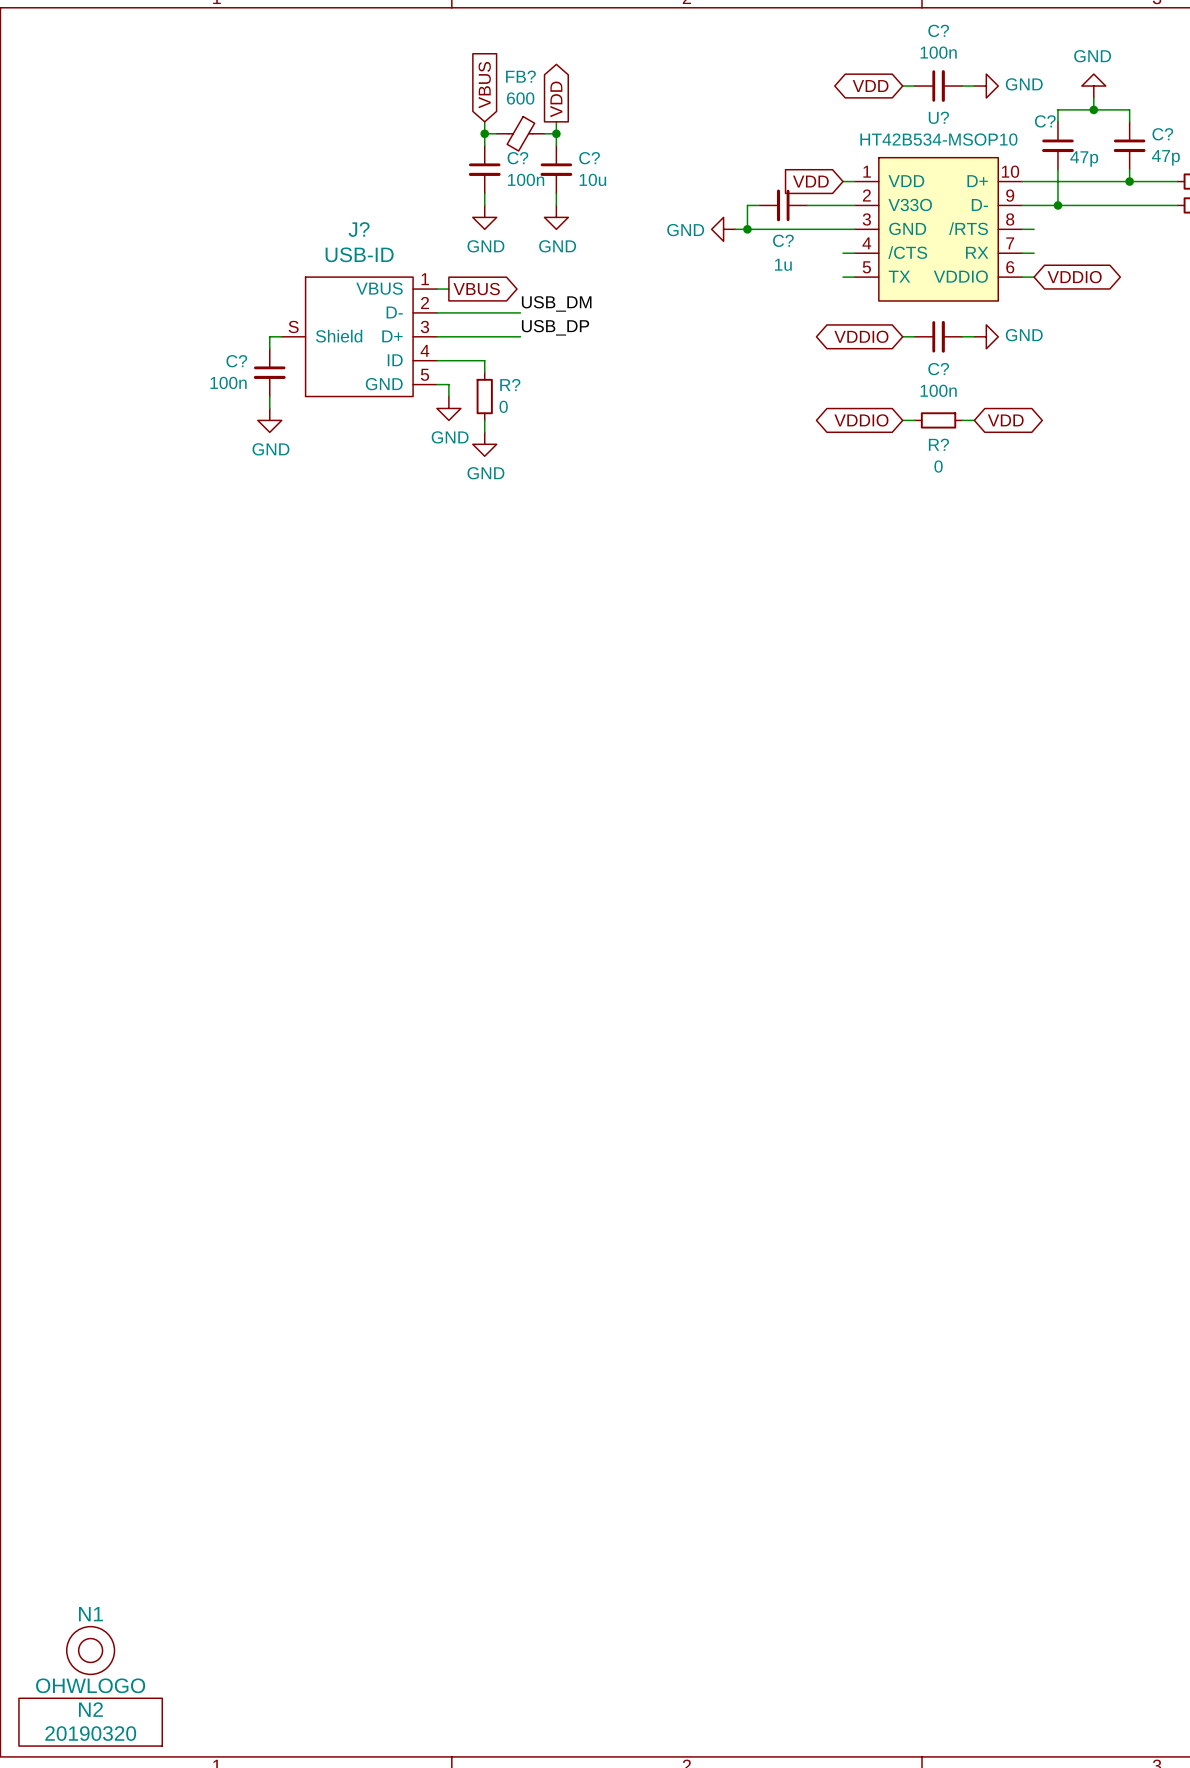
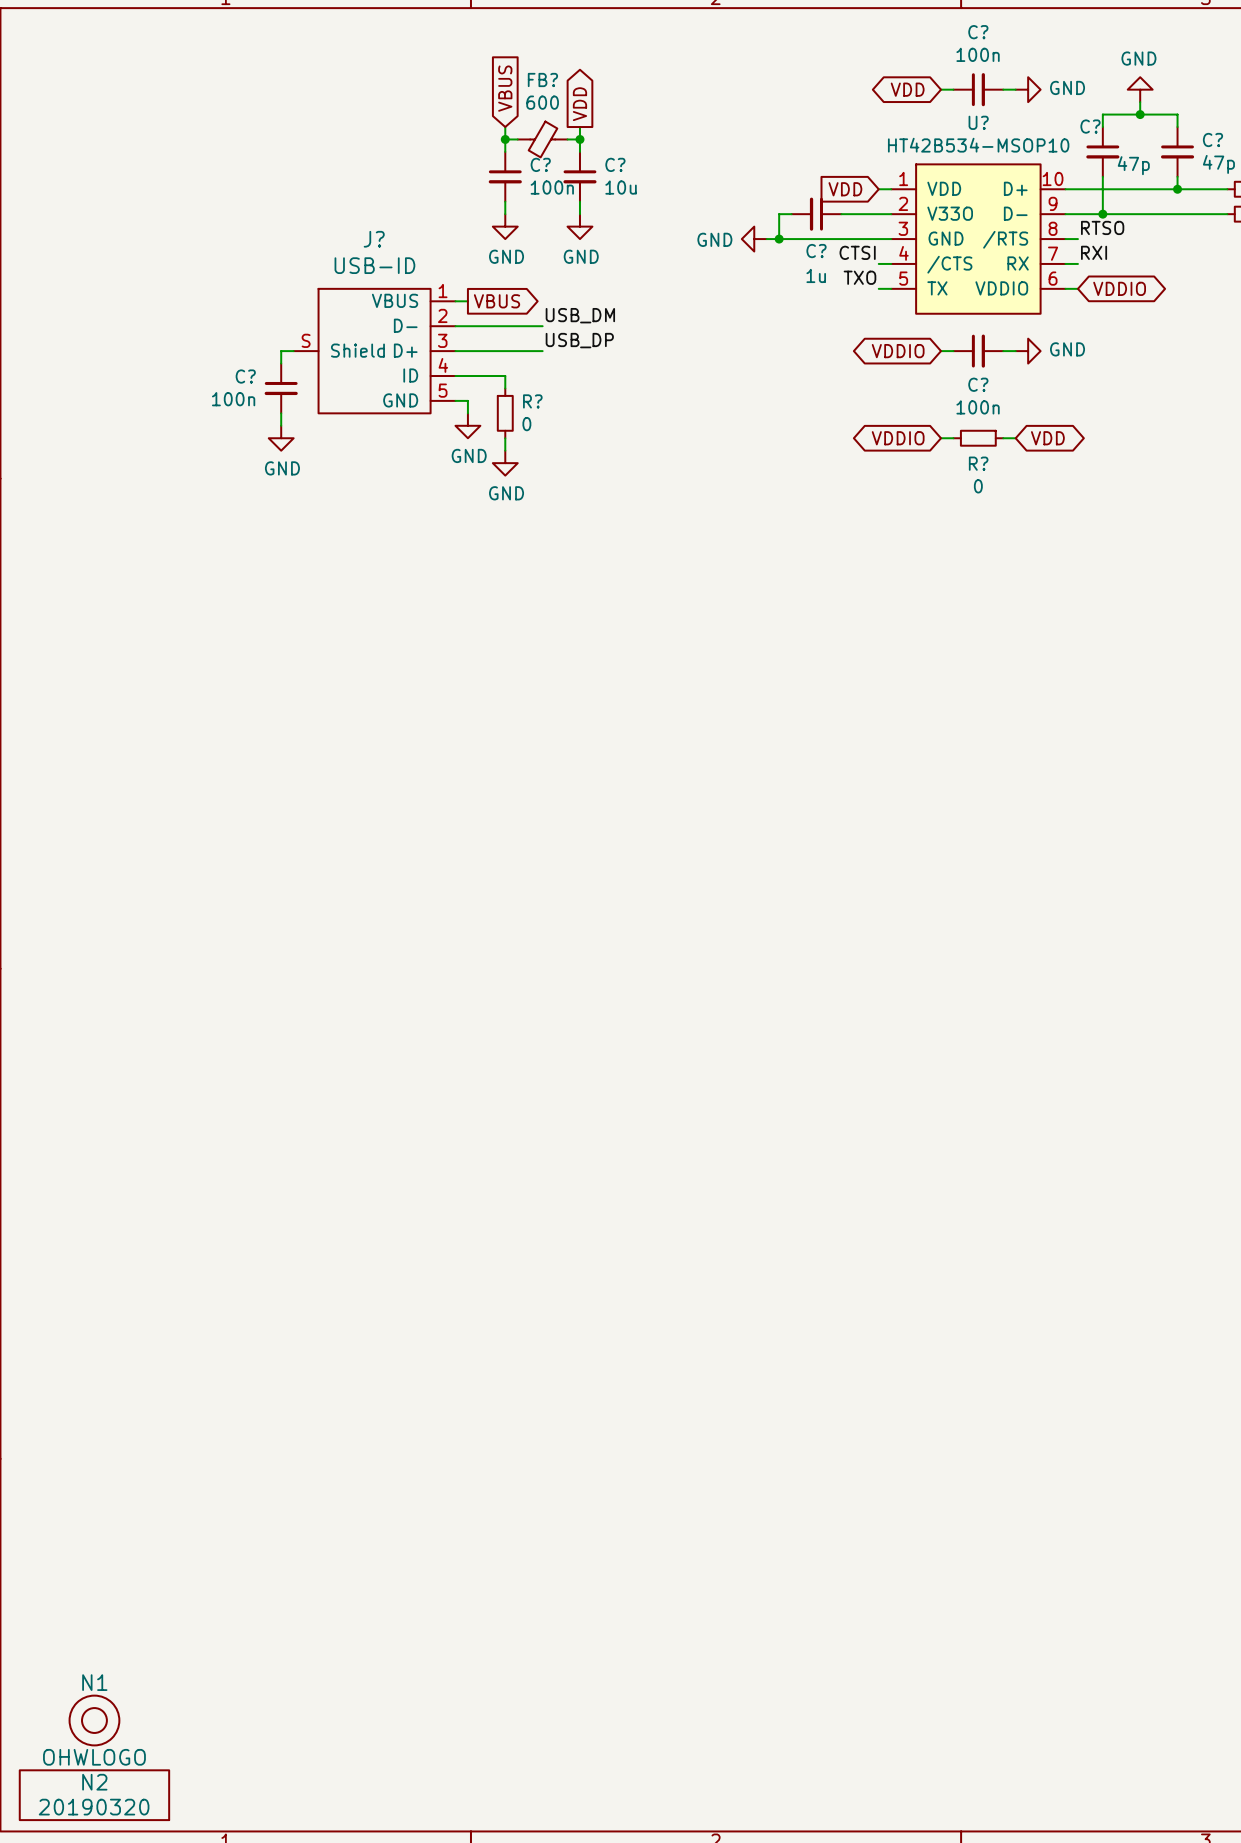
label: none -> RTSO (1102, 227)
label: none -> CTSI (857, 252)
label: none -> RXI (1094, 252)
label: none -> TXO (859, 277)

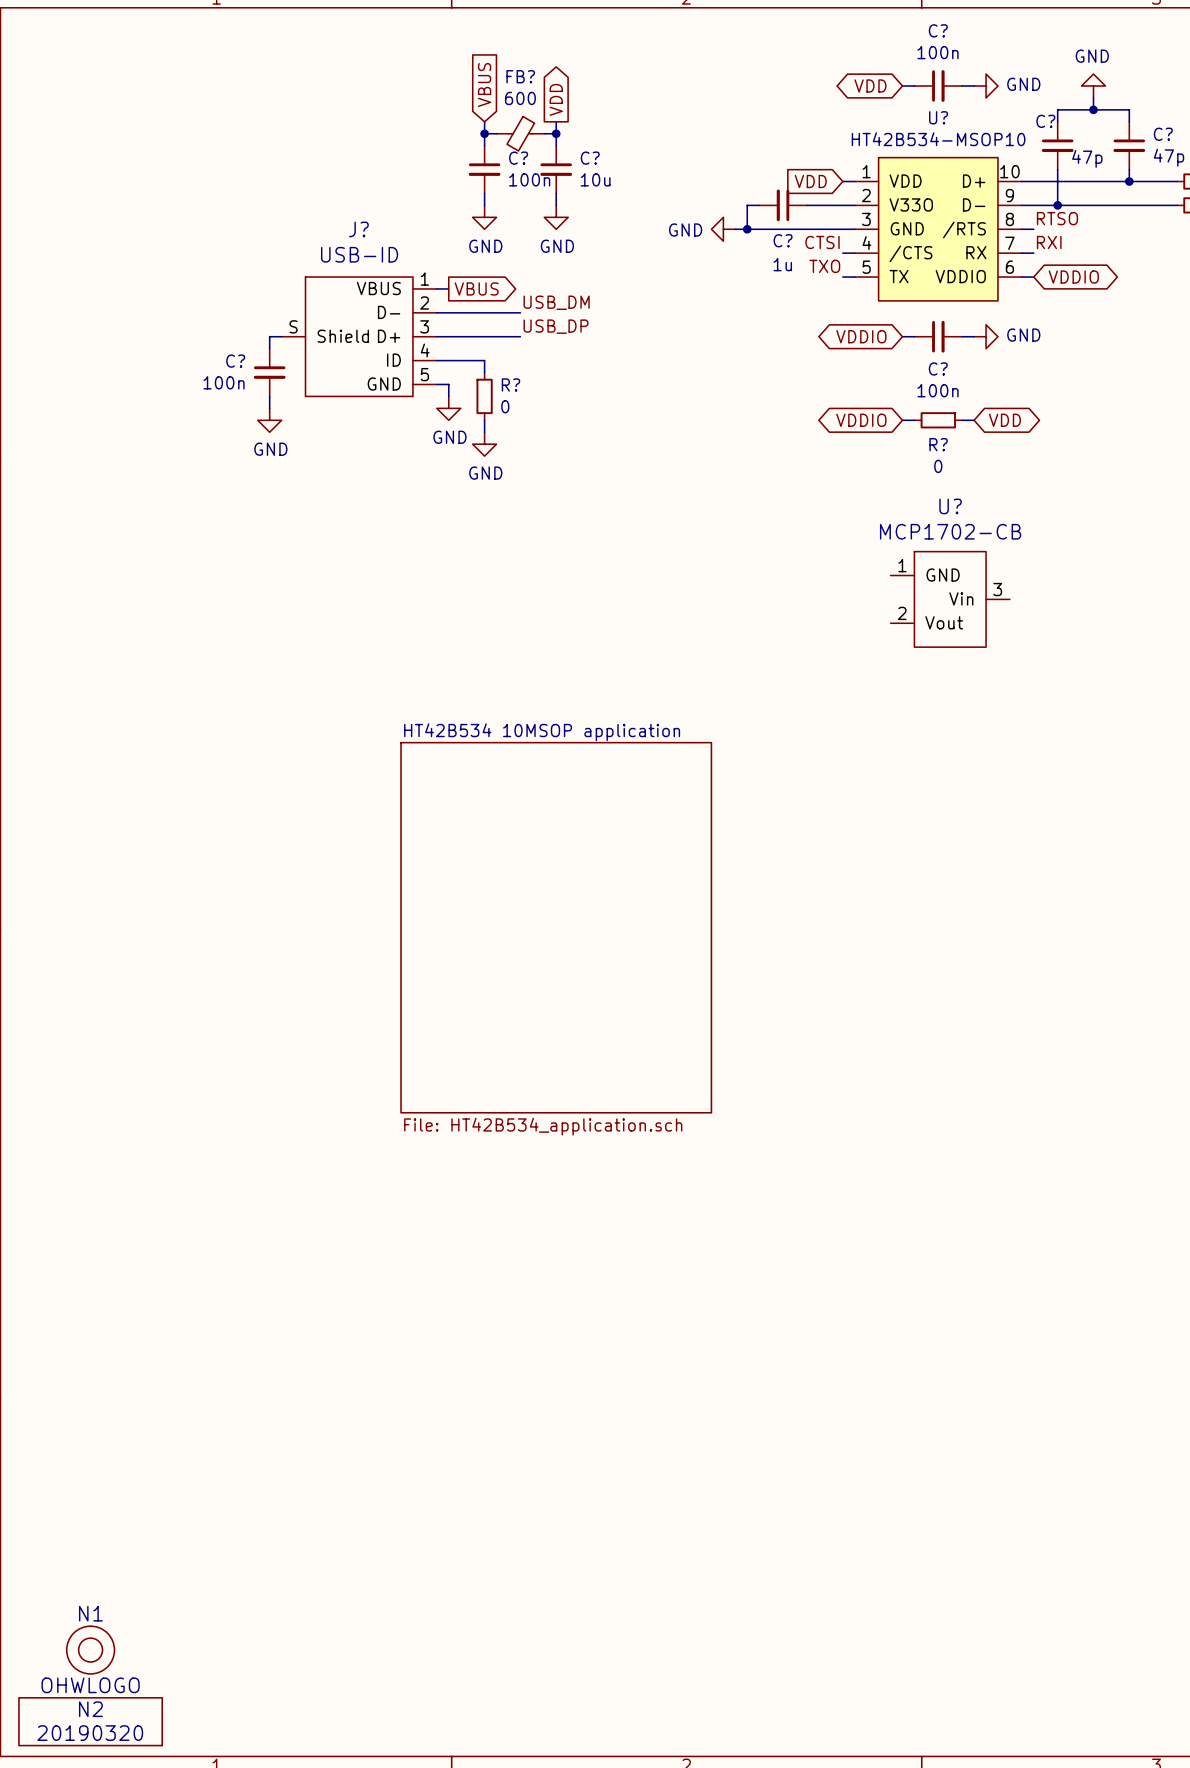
U?: none -> MCP1702-CB (950, 599)
sheet HT42B534 10MSOP application: none -> File: HT42B534_application.sch (556, 927)

